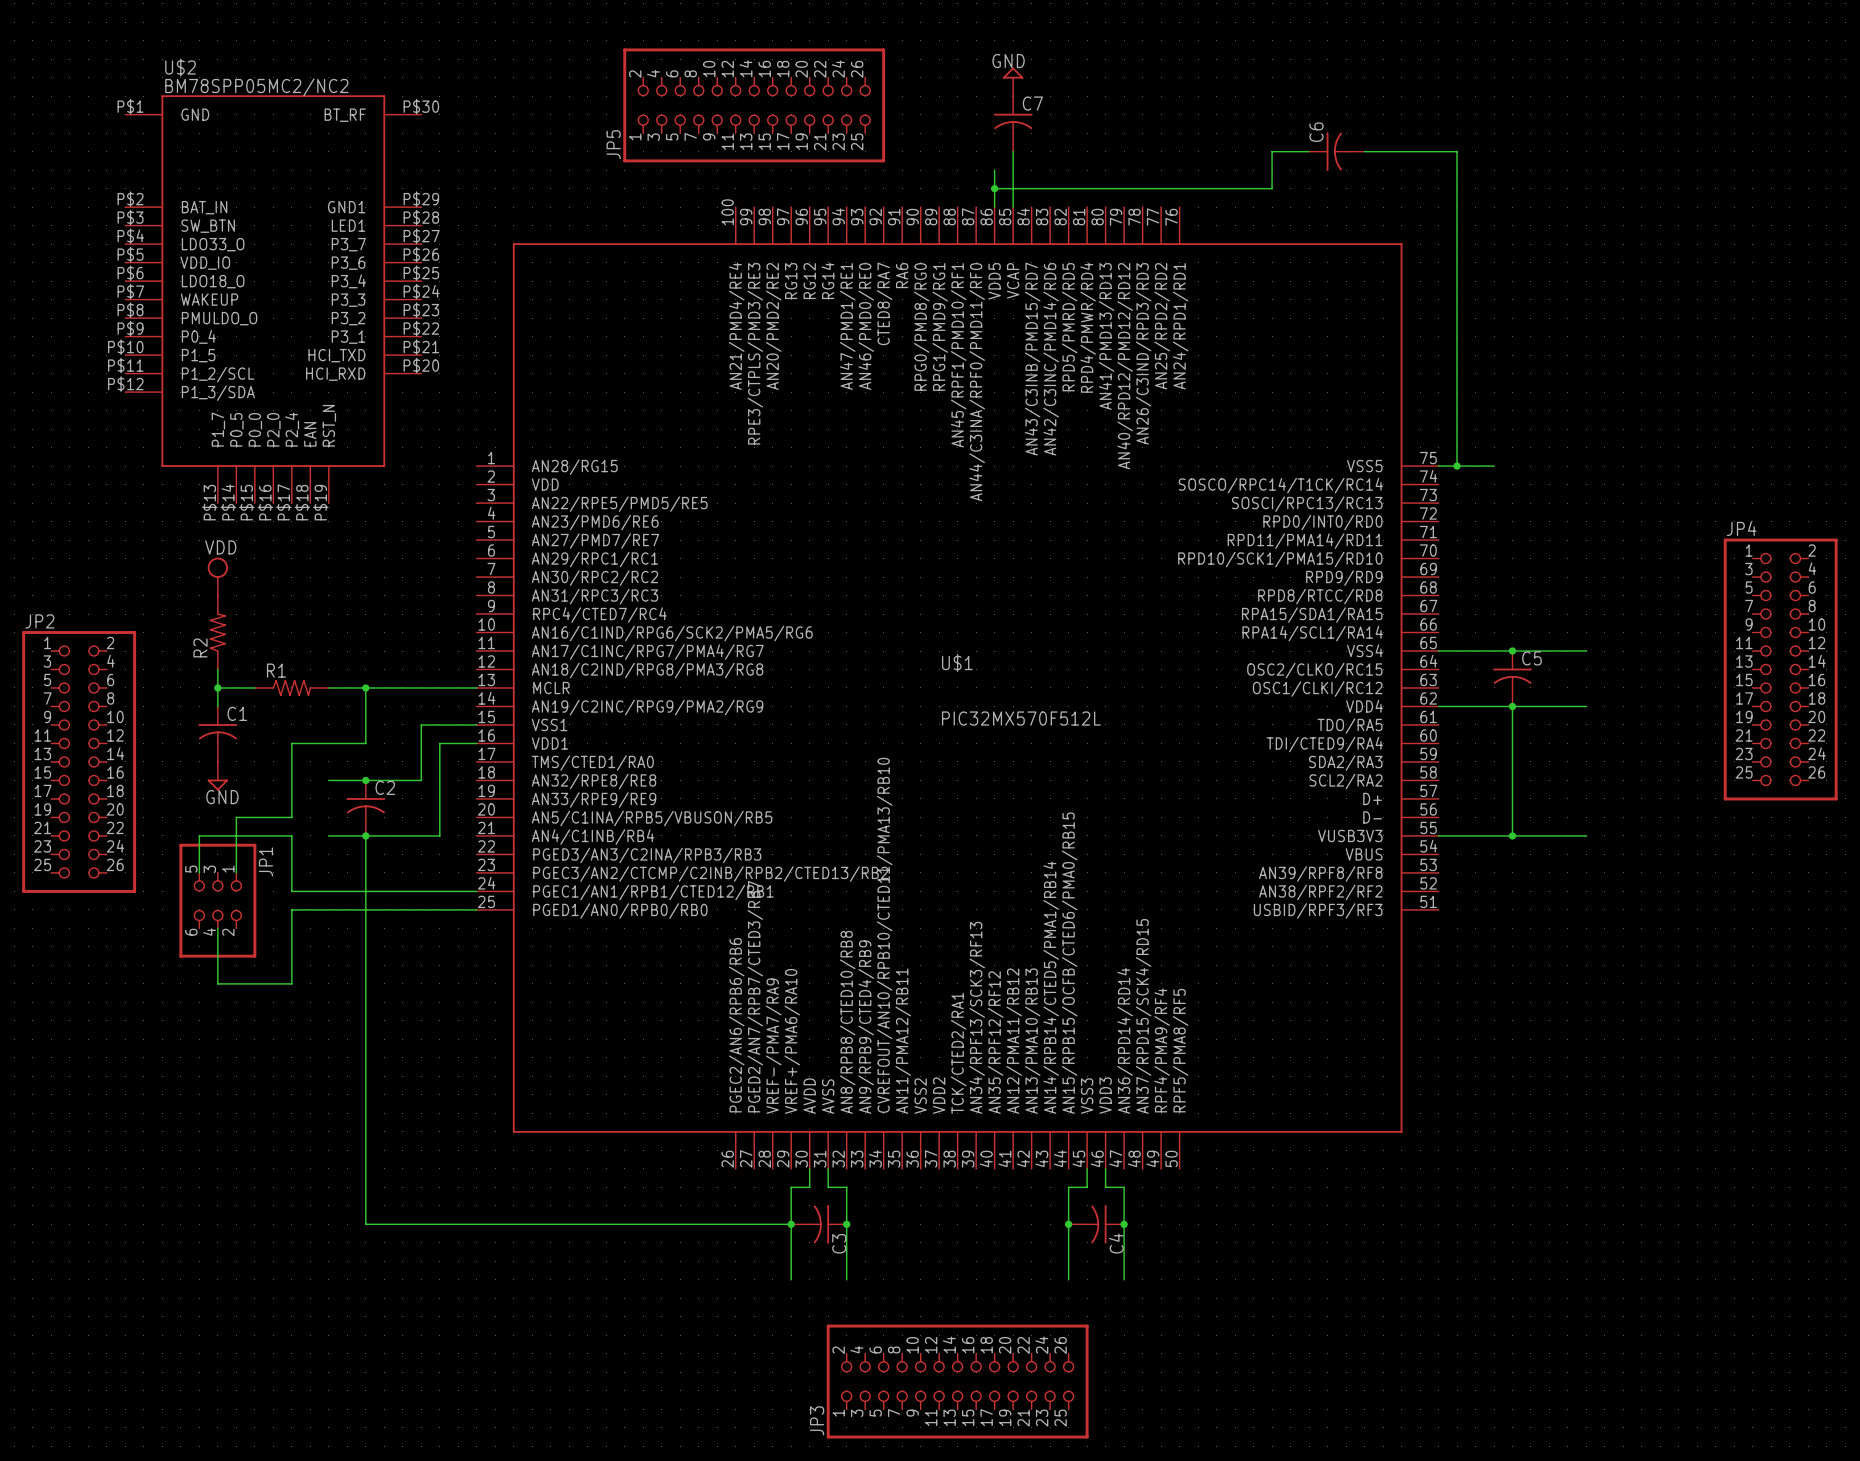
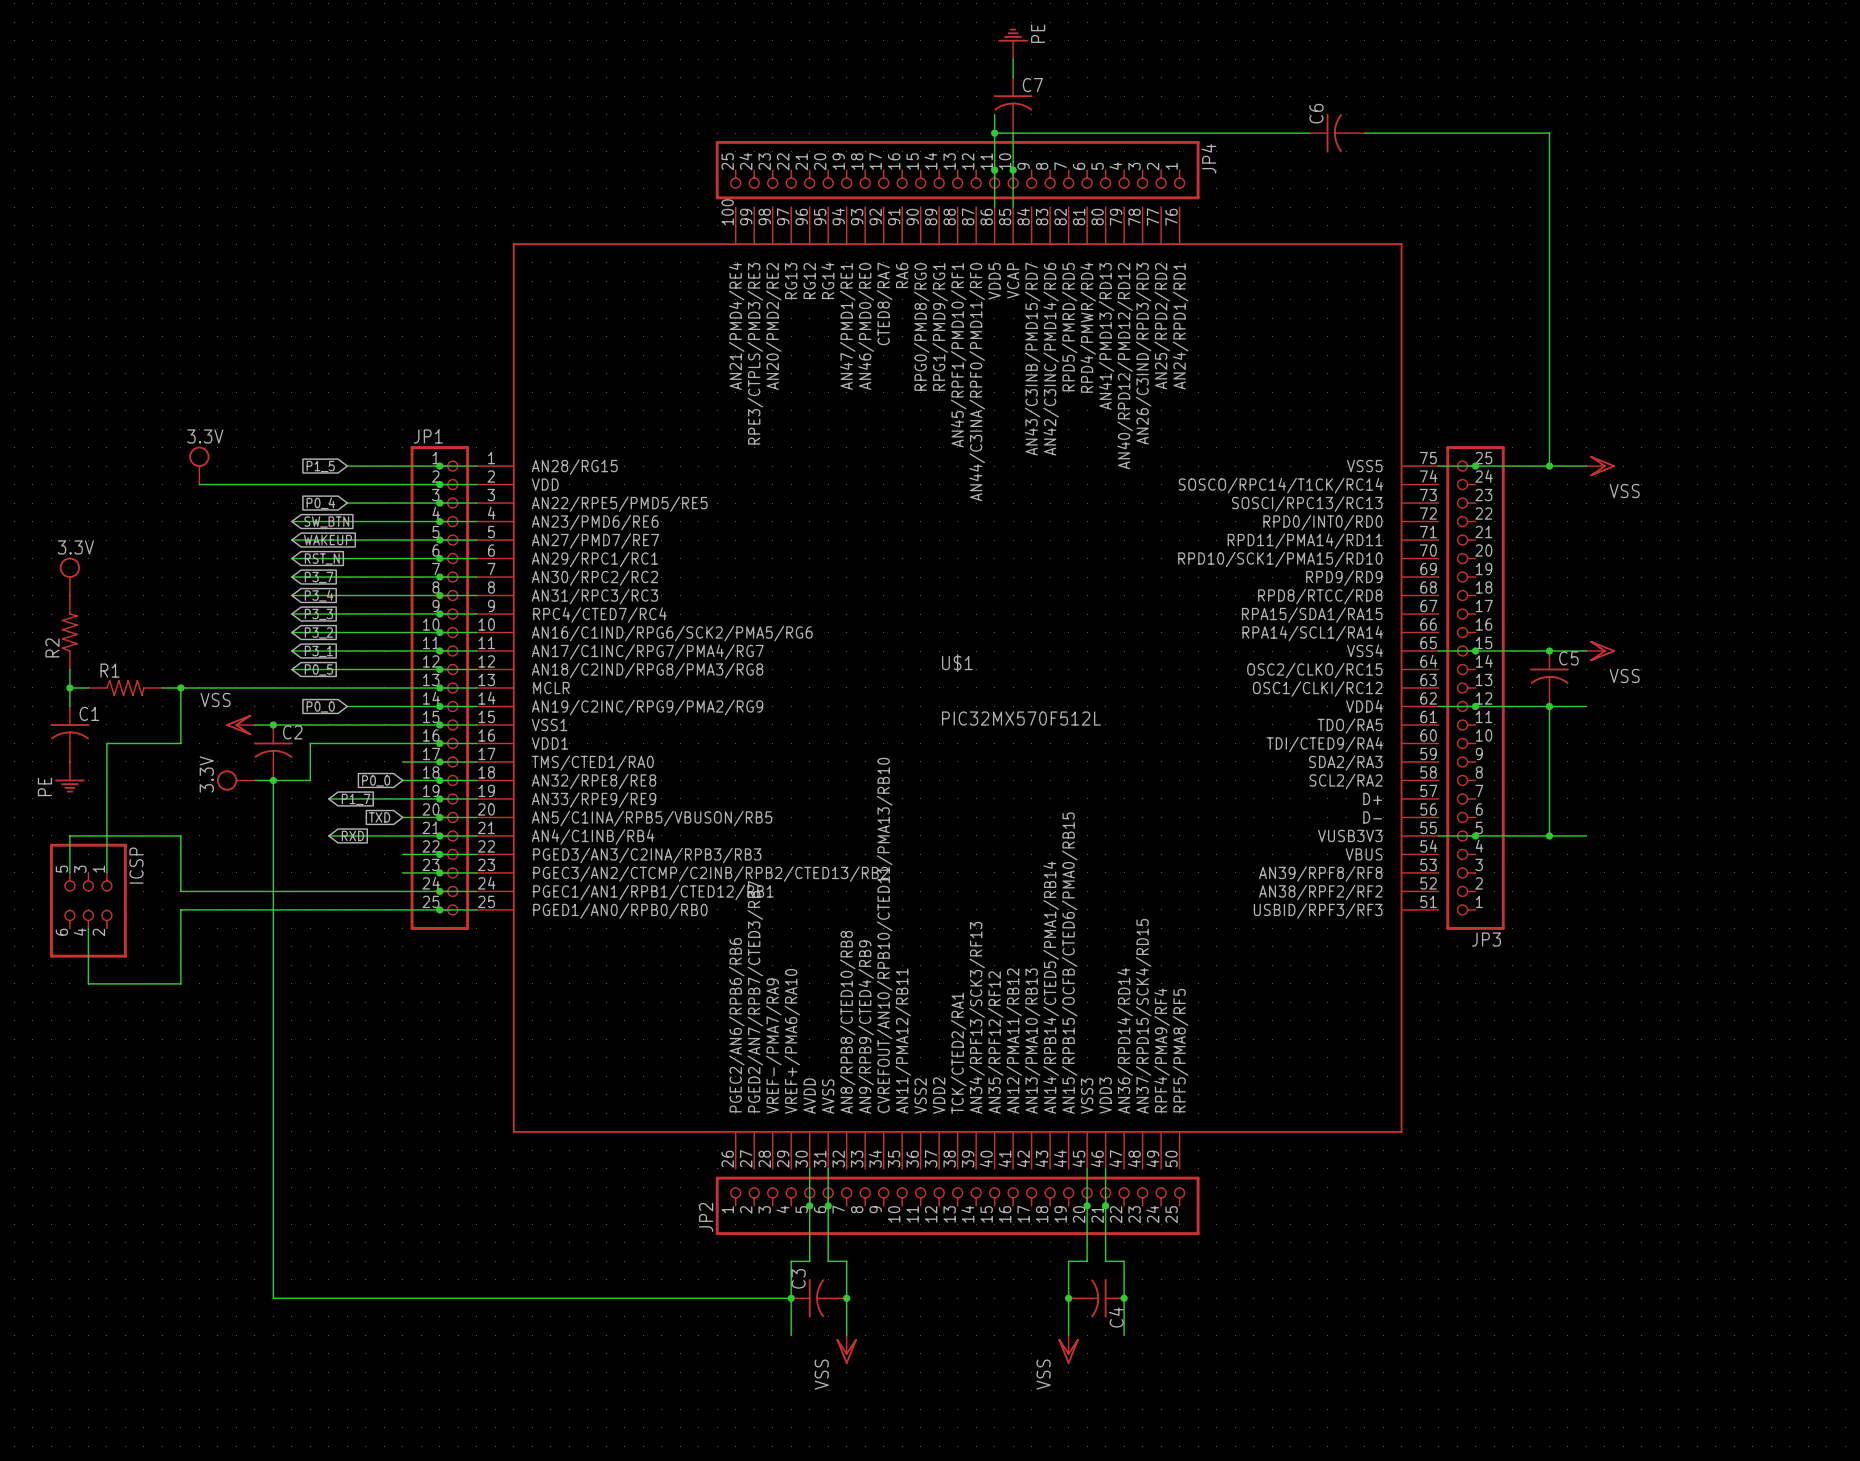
power symbol: none -> PE (1013, 43)
wire: none -> (1013, 59) (1013, 77)
power symbol: GND (1013, 81) -> none
JP5: (754, 105) -> none
wire: none -> (994, 114) (994, 170)
C7 position: (1013, 123) -> (1013, 105)
wire: none -> (994, 133) (1309, 133)
junction: none -> (994, 133)
wire: none -> (1364, 133) (1549, 133) (1549, 466)
wire: (1309, 151) (1272, 151) (1272, 188) (994, 188) -> none
C6 position: (1336, 151) -> (1336, 133)
wire: (1364, 151) (1457, 151) (1457, 466) -> none
junction: none -> (994, 170)
junction: none -> (1013, 170)
junction: (994, 188) -> none
U$2: BM78SPP05MC2/NC2 (273, 299) -> none
power symbol: none -> 3.3V (199, 465)
global label: none -> P1_5 (320, 466)
wire: none -> (347, 466) (476, 466)
junction: none -> (439, 466)
junction position: (1457, 466) -> (1475, 466)
wire: none -> (1494, 466) (1586, 466)
junction: none -> (1549, 466)
power symbol: none -> VSS (1600, 466)
wire: none -> (199, 484) (476, 484)
junction: none -> (439, 484)
global label: none -> P0_4 (320, 503)
wire: none -> (347, 503) (476, 503)
junction: none -> (439, 503)
wire: none -> (291, 521) (476, 521)
global label: none -> SW_BTN (326, 521)
junction: none -> (439, 521)
JP4 name position: JP4 (1741, 528) -> JP4 (1208, 158)
JP4 symbol: [1723, 538, 1838, 801] -> [715, 140, 1200, 200]
wire: none -> (291, 540) (476, 540)
global label: none -> WAKEUP (327, 540)
junction: none -> (439, 540)
wire: none -> (291, 558) (476, 558)
global label: none -> RST_N (322, 558)
junction: none -> (439, 558)
power symbol: none -> 3.3V (69, 576)
power symbol: VDD (217, 576) -> none
wire: none -> (291, 577) (476, 577)
global label: none -> P3_7 (319, 577)
junction: none -> (439, 577)
wire: none -> (291, 595) (476, 595)
global label: none -> P3_4 (319, 595)
junction: none -> (439, 595)
wire: none -> (291, 614) (476, 614)
global label: none -> P3_3 (318, 614)
junction: none -> (439, 614)
JP2 name position: JP2 (39, 621) -> JP2 (706, 1217)
JP2 symbol: [22, 631, 137, 893] -> [715, 1176, 1200, 1236]
R2 position: (217, 632) -> (69, 632)
wire: none -> (291, 632) (476, 632)
global label: none -> P3_2 (318, 632)
junction: none -> (439, 632)
wire: none -> (291, 651) (476, 651)
global label: none -> P3_1 (318, 651)
junction: none -> (439, 651)
junction: none -> (1475, 651)
junction: (1512, 651) -> none
junction: none -> (1549, 651)
power symbol: none -> VSS (1600, 651)
wire: (217, 669) (217, 706) -> (69, 669) (69, 706)
wire: none -> (291, 669) (476, 669)
global label: none -> P0_5 (318, 669)
junction: none -> (439, 669)
C5 position: (1512, 678) -> (1549, 678)
wire: none -> (69, 687) (88, 687)
junction: none -> (69, 687)
wire: none -> (162, 687) (217, 687)
wire: none -> (180, 687) (180, 743) (106, 743) (106, 872)
junction: none -> (180, 687)
junction: (217, 687) -> none
R1 position: (291, 687) -> (125, 687)
wire: (365, 687) (365, 743) -> (439, 743) (365, 743)
junction: (365, 687) -> none
junction: none -> (439, 687)
global label: none -> P0_0 (320, 706)
wire: none -> (347, 706) (476, 706)
junction: none -> (439, 706)
junction: none -> (1475, 706)
wire: (1512, 706) (1512, 835) -> (1549, 706) (1549, 835)
junction: (1512, 706) -> none
junction: none -> (1549, 706)
power symbol: none -> VSS (240, 724)
wire: none -> (254, 724) (421, 724)
junction: none -> (273, 724)
wire: (421, 724) (421, 780) -> (476, 780) (421, 780)
junction: none -> (439, 724)
C1 position: (217, 734) -> (69, 734)
wire: (310, 743) (291, 743) (291, 817) (236, 817) (236, 872) -> (310, 743) (310, 780) (254, 780)
wire: (439, 743) (439, 835) -> (476, 835) (439, 835)
junction: none -> (439, 743)
junction: none -> (439, 761)
power symbol: GND (217, 776) -> none
power symbol: none -> PE (69, 777)
power symbol: none -> 3.3V (235, 780)
wire: none -> (273, 780) (273, 1298) (791, 1298)
junction: none -> (273, 780)
wire: (328, 780) (402, 780) -> (402, 761) (476, 761)
junction: (365, 780) -> none
global label: none -> P0_0 (376, 780)
junction: none -> (439, 780)
wire: none -> (328, 798) (476, 798)
junction: none -> (439, 798)
global label: none -> P1_7 (356, 799)
C2 position: (365, 808) -> (273, 752)
global label: none -> TXD (379, 817)
wire: none -> (402, 817) (476, 817)
junction: none -> (439, 817)
global label: none -> RXD (352, 835)
wire: (365, 835) (365, 1224) (791, 1224) -> none
junction: (365, 835) -> none
junction: none -> (439, 835)
junction: none -> (1475, 835)
junction: (1512, 835) -> none
junction: none -> (1549, 835)
JP1 symbol: [179, 843, 257, 958] -> [410, 446, 470, 930]
wire: none -> (402, 854) (476, 854)
junction: none -> (439, 854)
JP1 name position: JP1 (265, 861) -> JP1 (428, 436)
wire: (199, 872) (199, 835) (291, 835) (291, 891) -> (69, 872) (69, 835) (180, 835) (180, 891) (291, 891)
wire: none -> (402, 872) (476, 872)
junction: none -> (439, 872)
junction: none -> (439, 891)
ICSP: none -> (88, 900)
wire: (291, 909) (291, 983) (217, 983) (217, 928) -> (291, 909) (180, 909) (180, 983) (88, 983) (88, 928)
junction: none -> (439, 909)
wire: (809, 1187) (791, 1187) (791, 1261) -> (809, 1187) (809, 1261) (791, 1261)
wire: (828, 1187) (846, 1187) (846, 1261) -> (828, 1187) (828, 1261) (846, 1261)
wire: (1087, 1187) (1068, 1187) (1068, 1261) -> (1087, 1187) (1087, 1261) (1068, 1261)
wire: (1105, 1187) (1124, 1187) (1124, 1261) -> (1105, 1187) (1105, 1261) (1124, 1261)
junction: none -> (809, 1205)
junction: none -> (828, 1205)
junction: none -> (1087, 1205)
junction: none -> (1105, 1205)
junction: (791, 1224) -> none
C3 position: (818, 1224) -> (818, 1298)
C3 rotation: 0° (819, 1224) -> 180° (818, 1298)
junction: (846, 1224) -> none
junction: (1068, 1224) -> none
C4 position: (1096, 1224) -> (1096, 1298)
junction: (1124, 1224) -> none
wire: none -> (791, 1279) (791, 1335)
wire: none -> (846, 1279) (846, 1335)
wire: none -> (1068, 1279) (1068, 1335)
wire: none -> (1124, 1279) (1124, 1335)
junction: none -> (791, 1298)
junction: none -> (846, 1298)
junction: none -> (1068, 1298)
junction: none -> (1124, 1298)
JP3 symbol: [826, 1324, 1089, 1439] -> [1446, 446, 1505, 930]
power symbol: none -> VSS (846, 1349)
power symbol: none -> VSS (1068, 1349)
JP3 name position: JP3 (817, 1420) -> JP3 (1486, 939)

